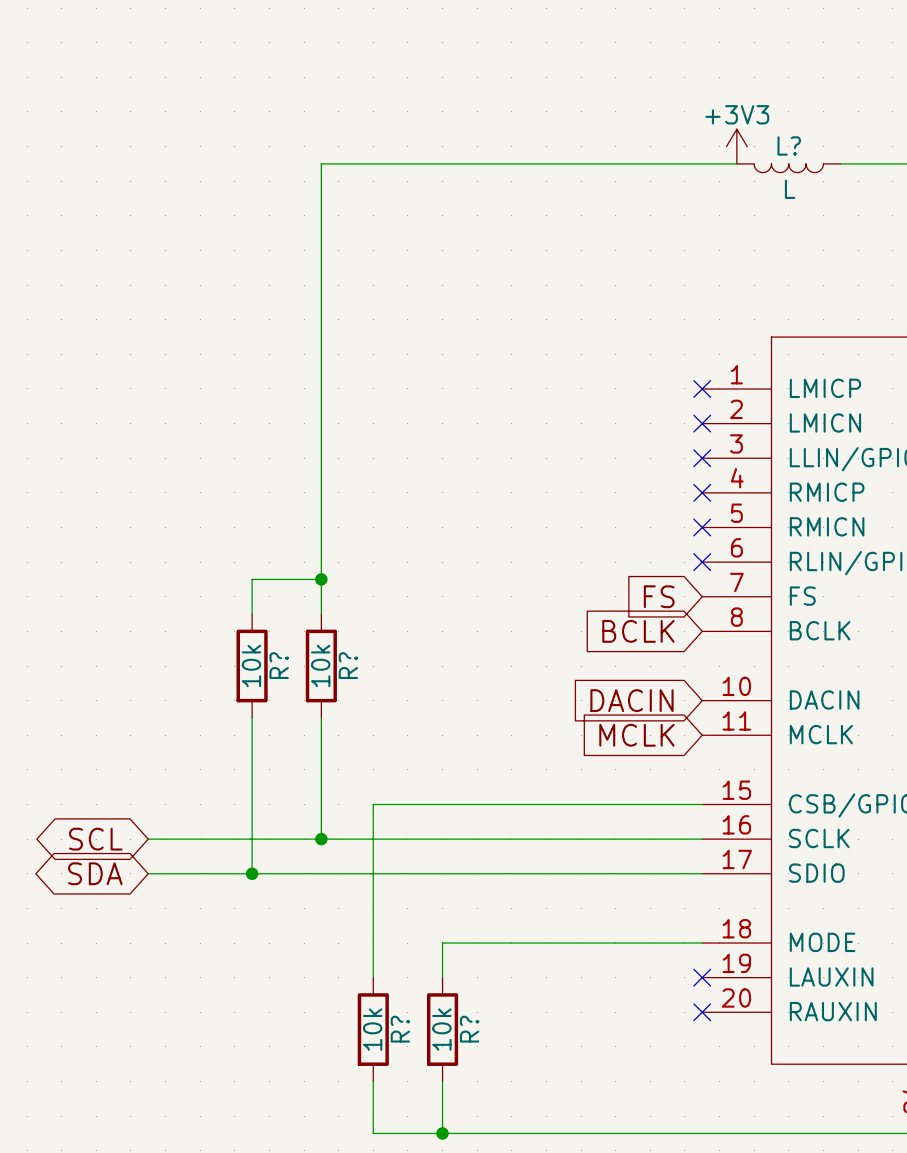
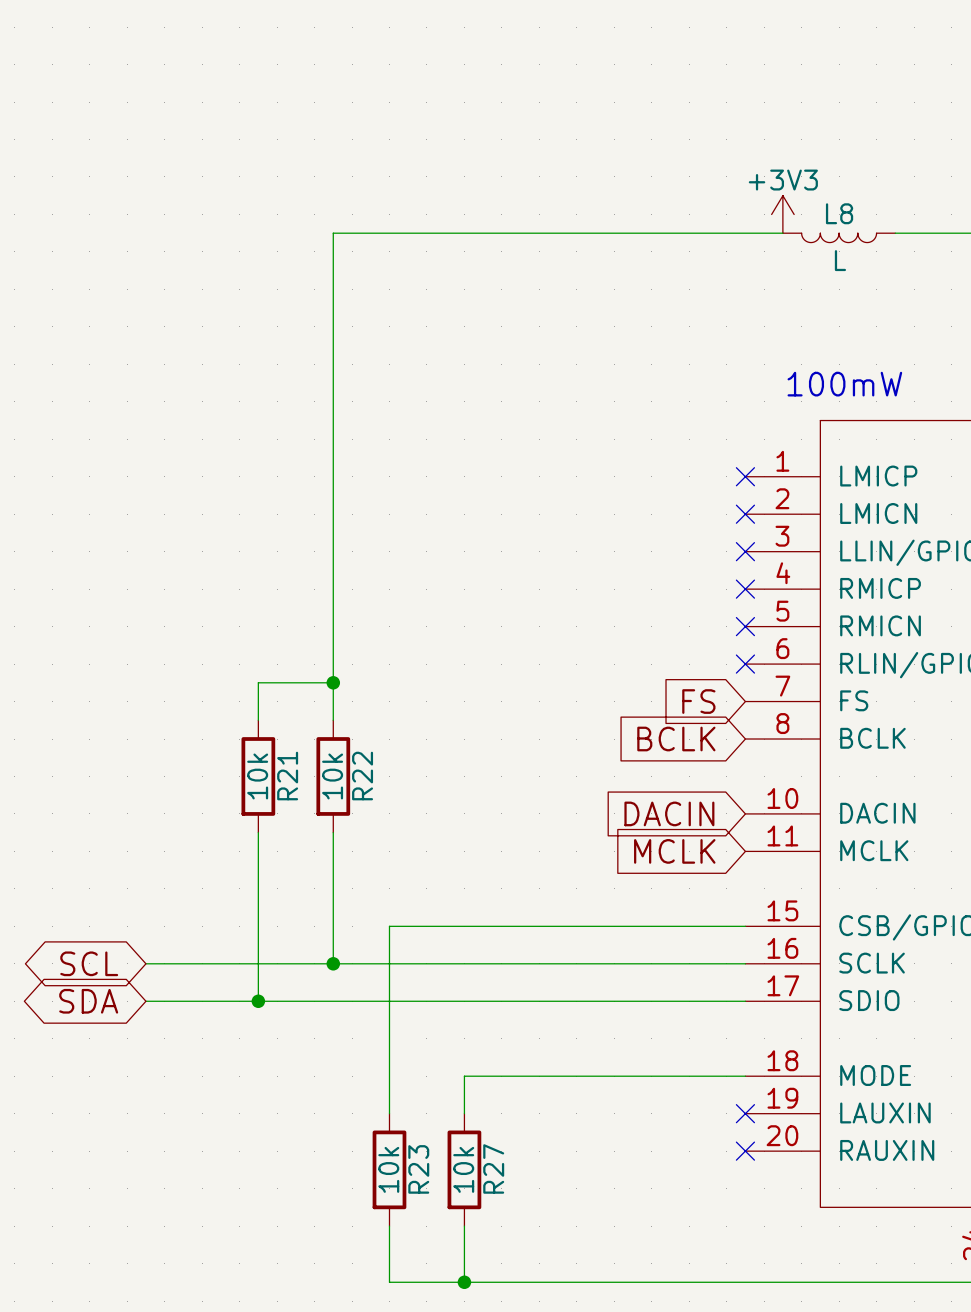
L? name: L? (789, 145) -> L8 (839, 213)
text: none -> 100mW (844, 384)
R? name: R? (279, 665) -> R21 (287, 776)
R? name: R? (348, 665) -> R22 (362, 776)
R? name: R? (400, 1029) -> R23 (418, 1169)
R? name: R? (469, 1029) -> R27 (493, 1168)

